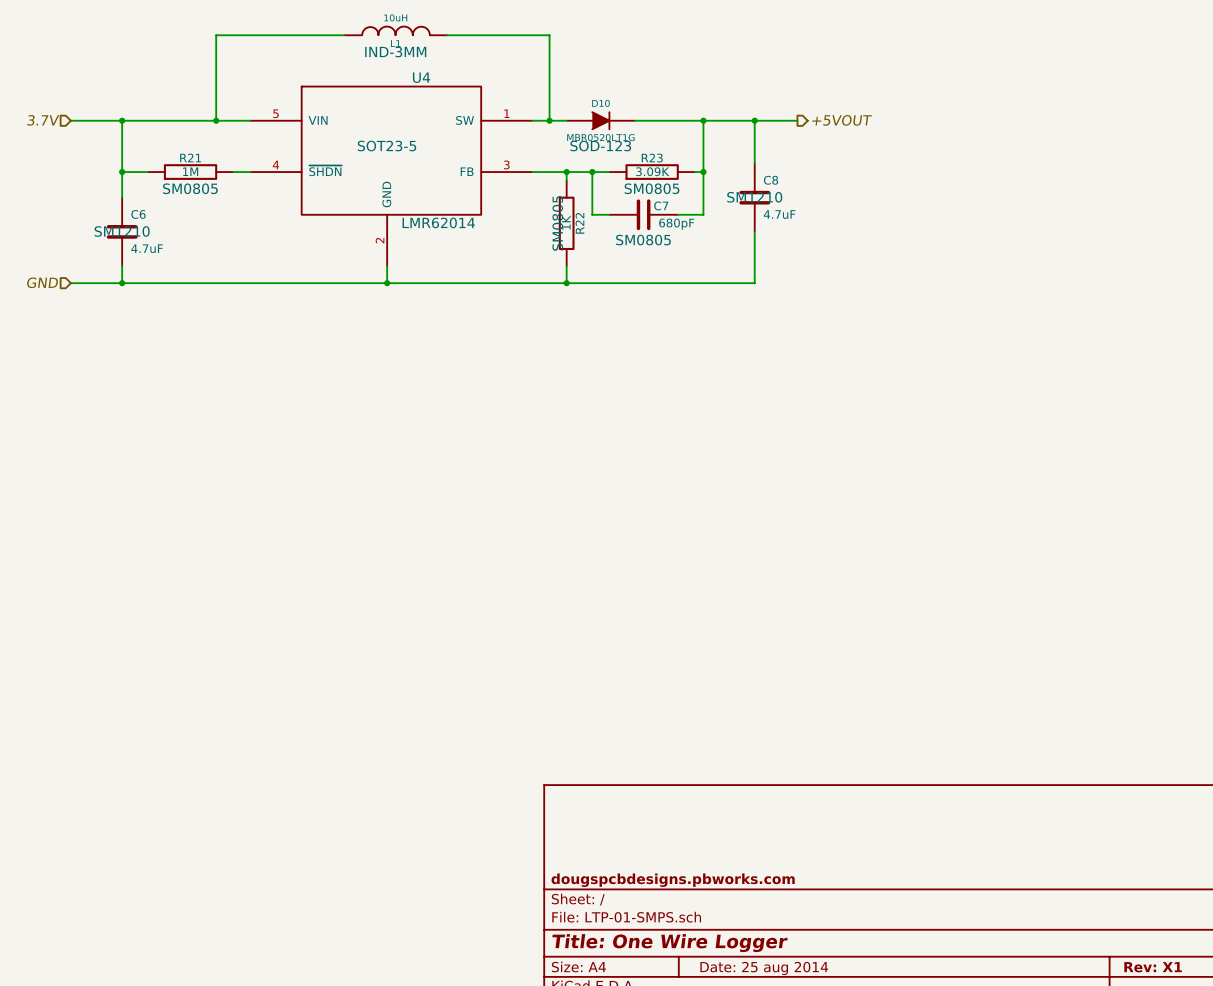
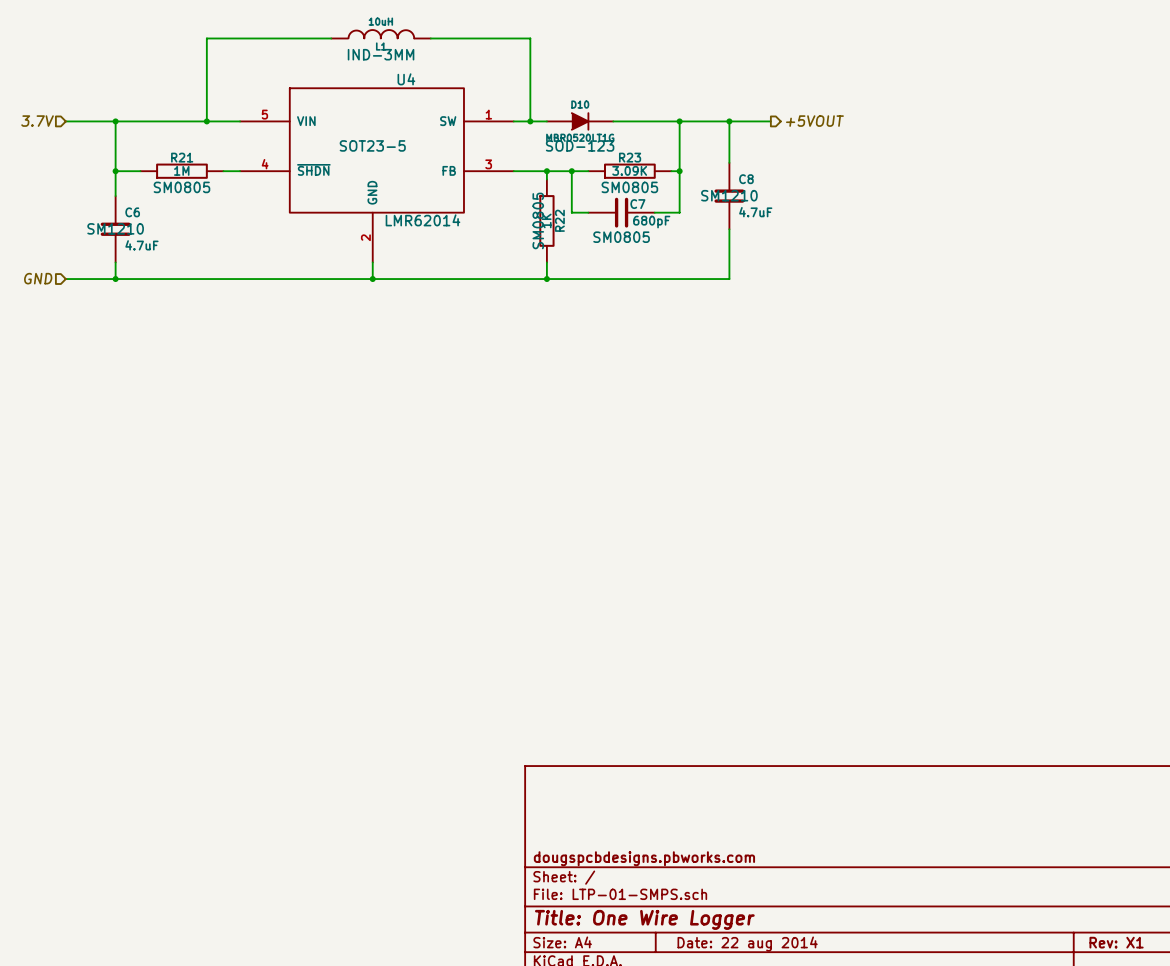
title block: Date: 25 aug 2014 (764, 968) -> Date: 22 aug 2014 (747, 944)

